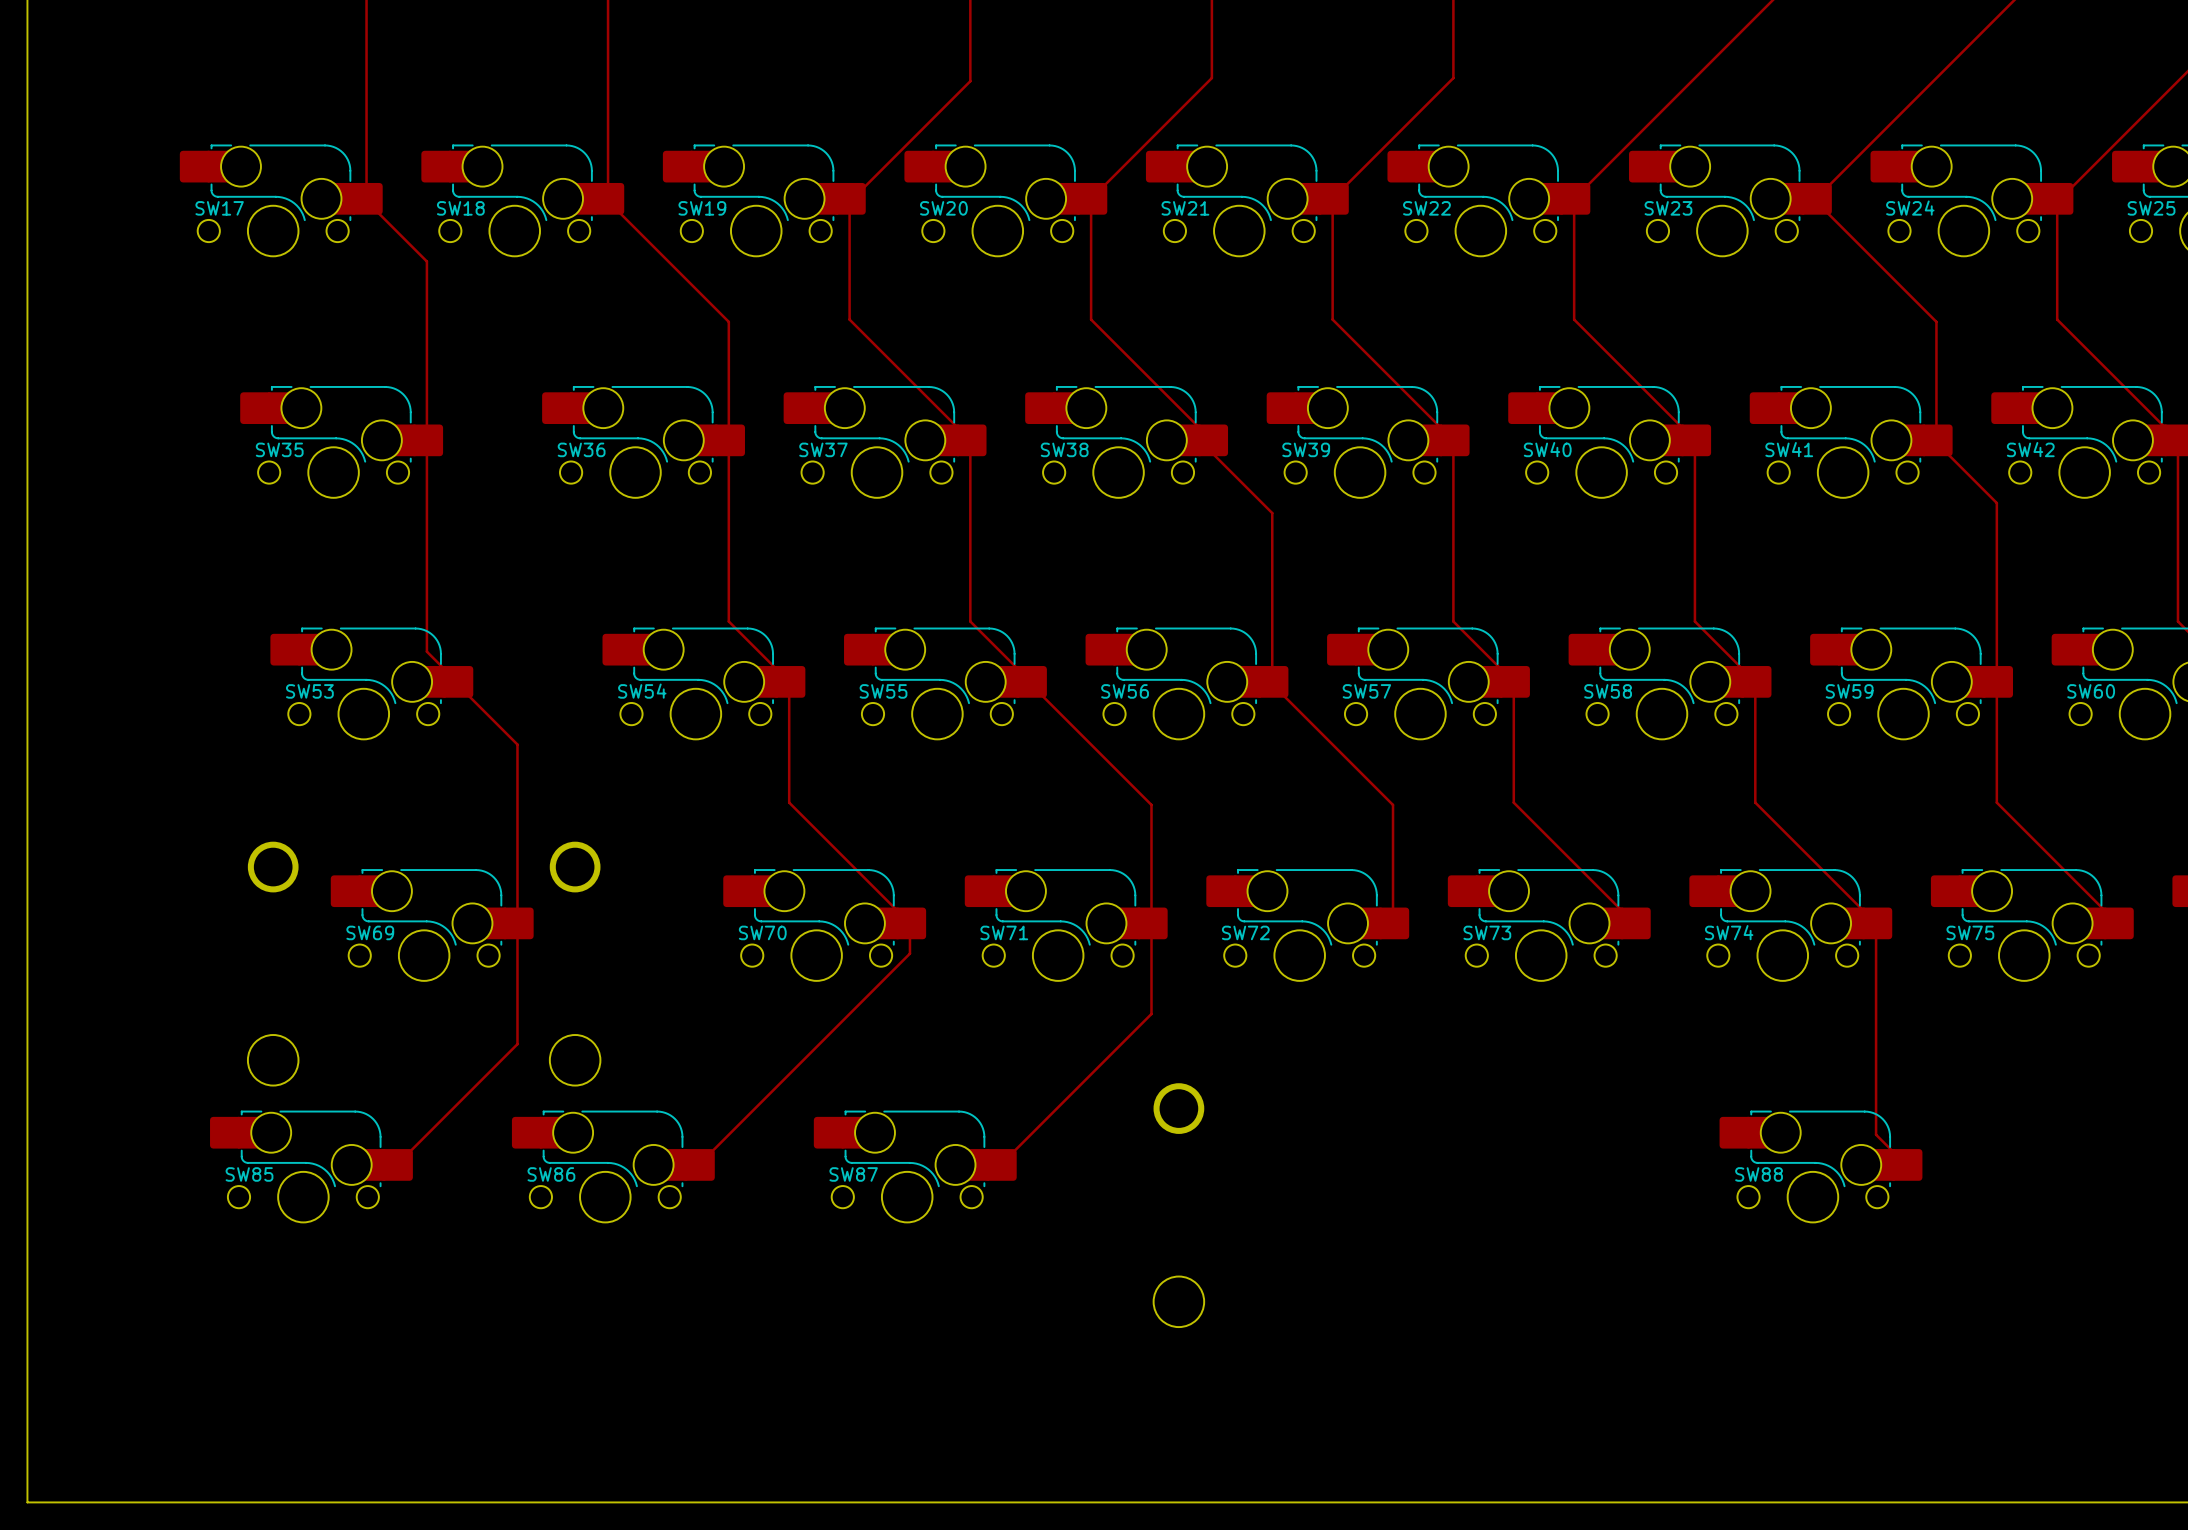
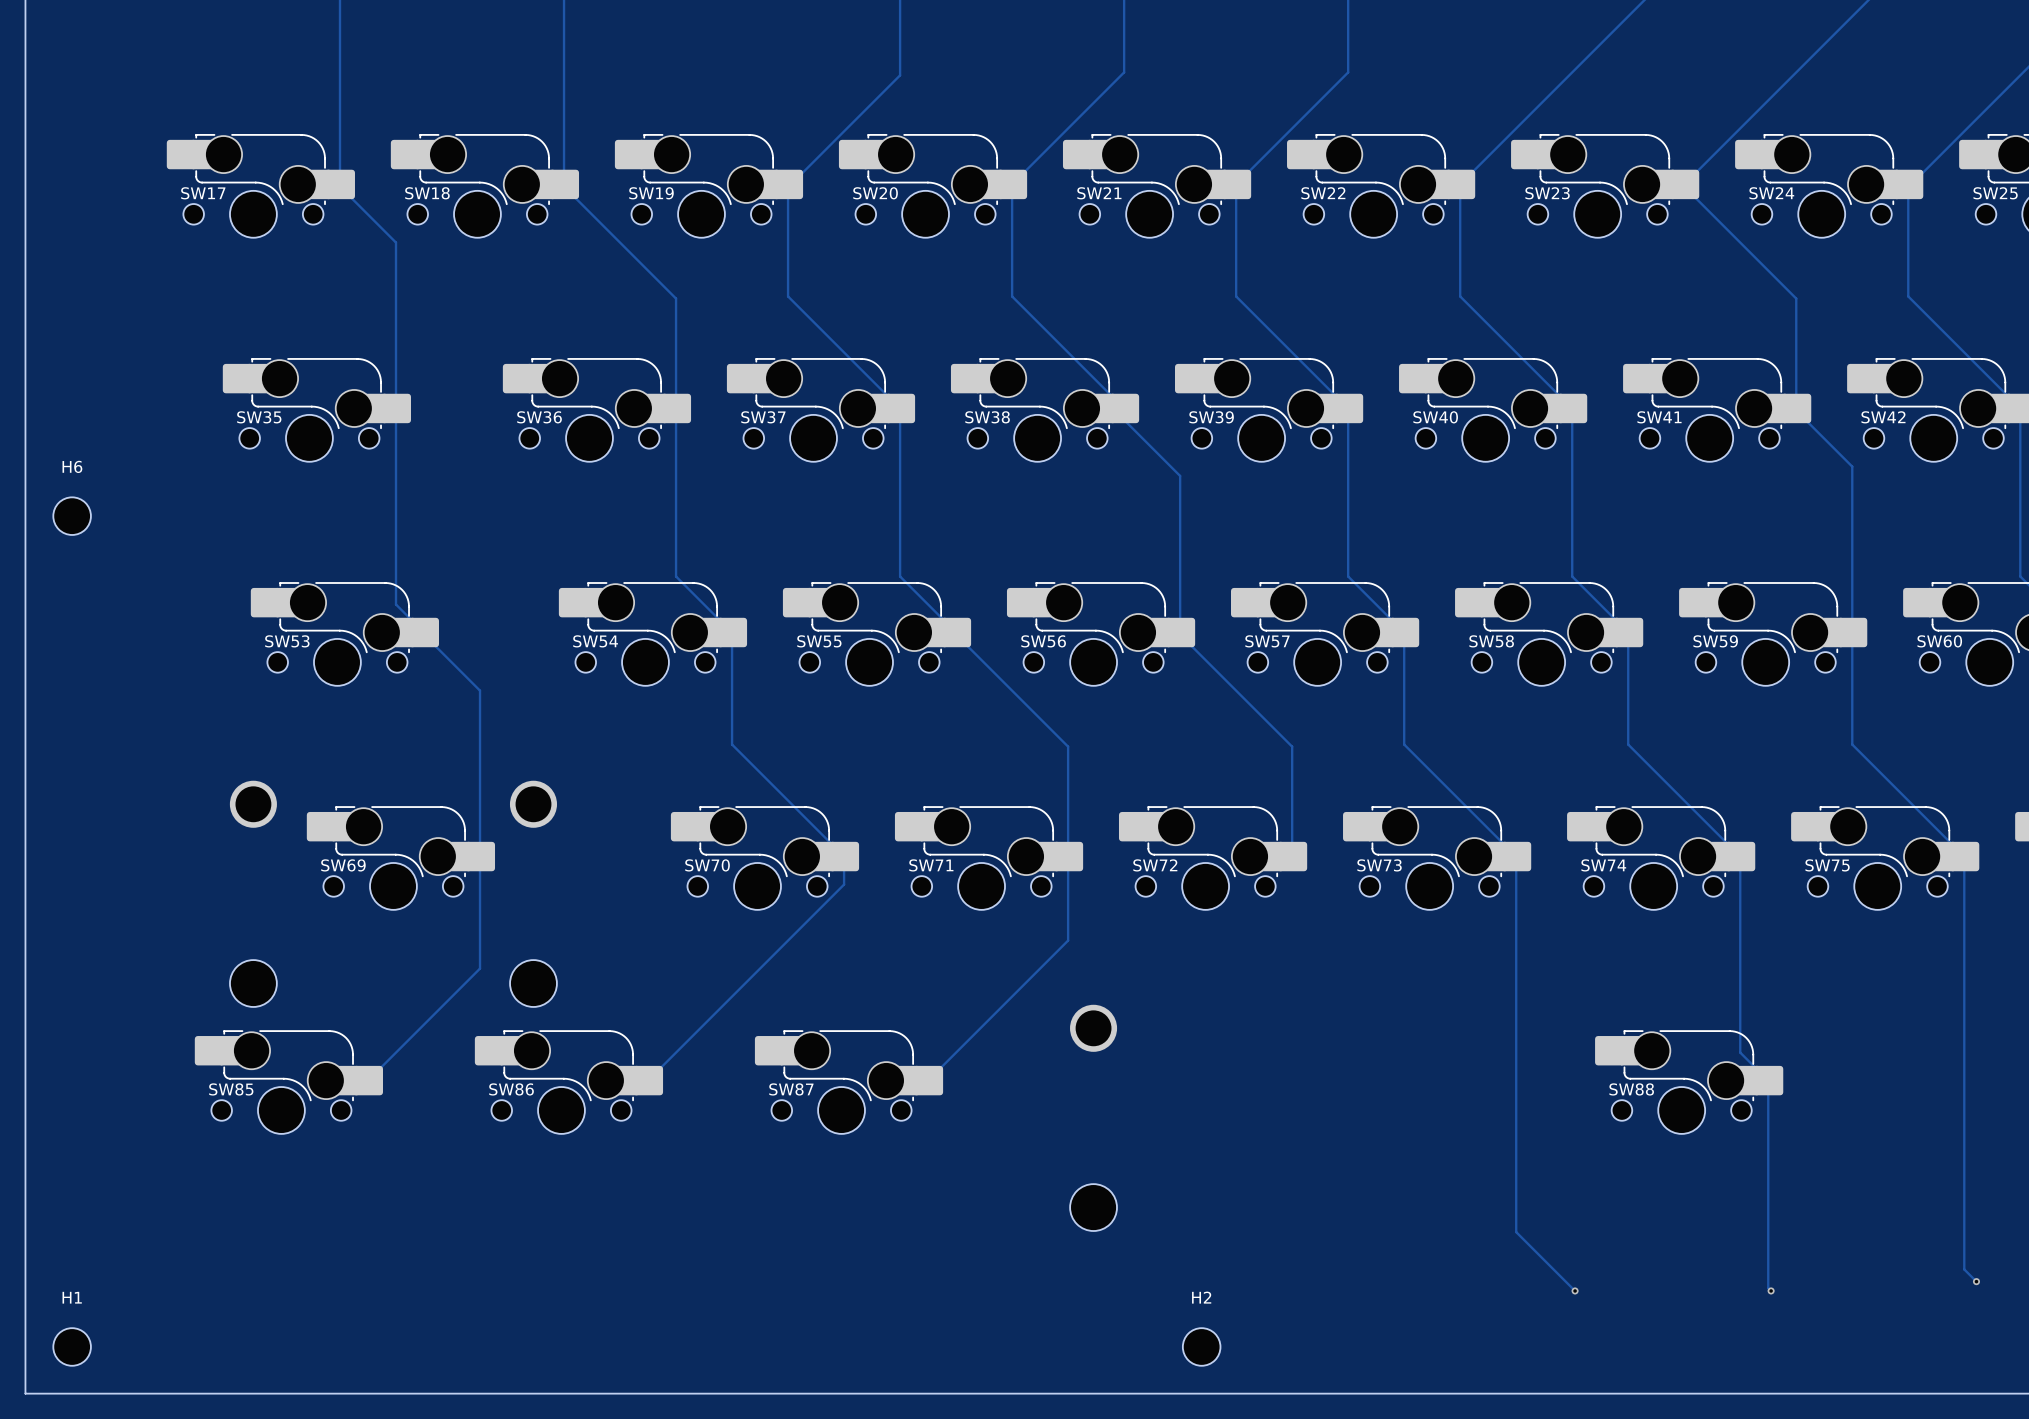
H6: none -> (72, 516)
track: none -> (1516, 856) (1516, 1232) (1575, 1290)
track: none -> (1964, 856) (1964, 1269) (1976, 1281)
track: none -> (1768, 1080) (1768, 1288) (1771, 1290)
via: none -> (1976, 1281)
via: none -> (1575, 1290)
via: none -> (1771, 1290)
H1: none -> (72, 1346)
H2: none -> (1201, 1346)

